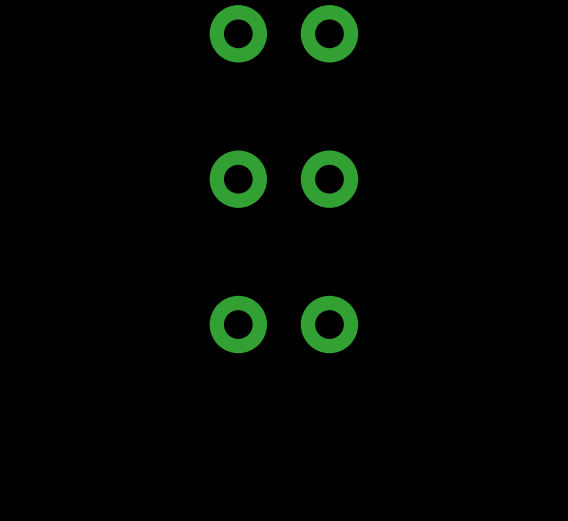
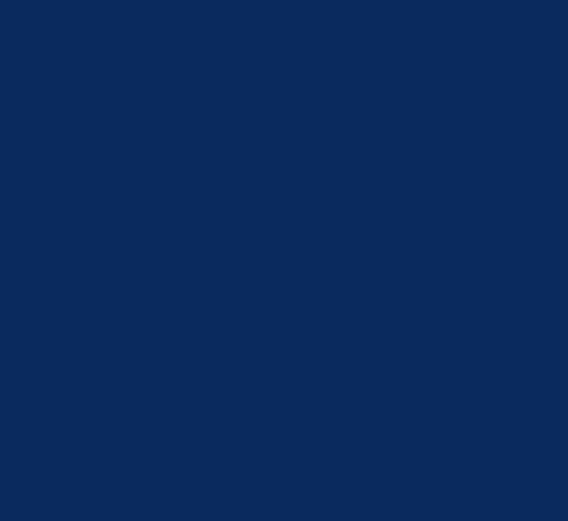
part: (283, 33) -> none
part: (283, 179) -> none
part: (283, 324) -> none

